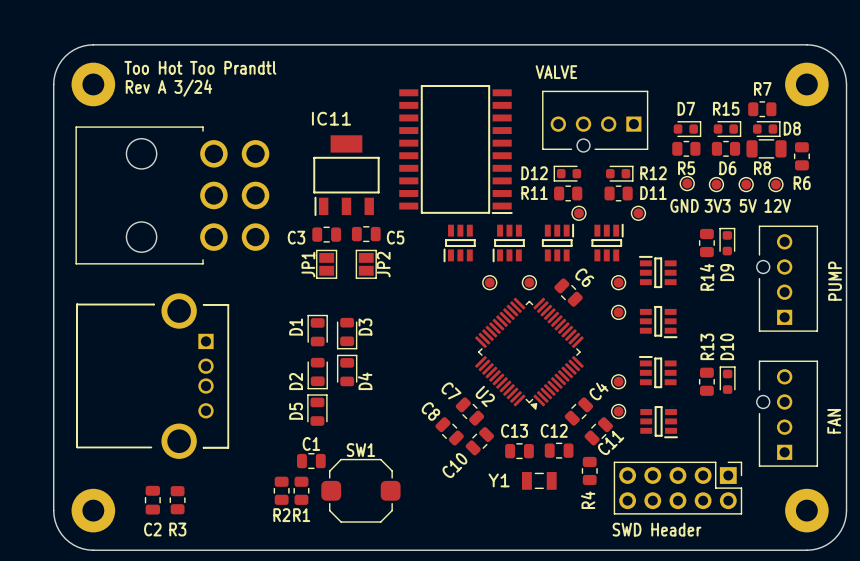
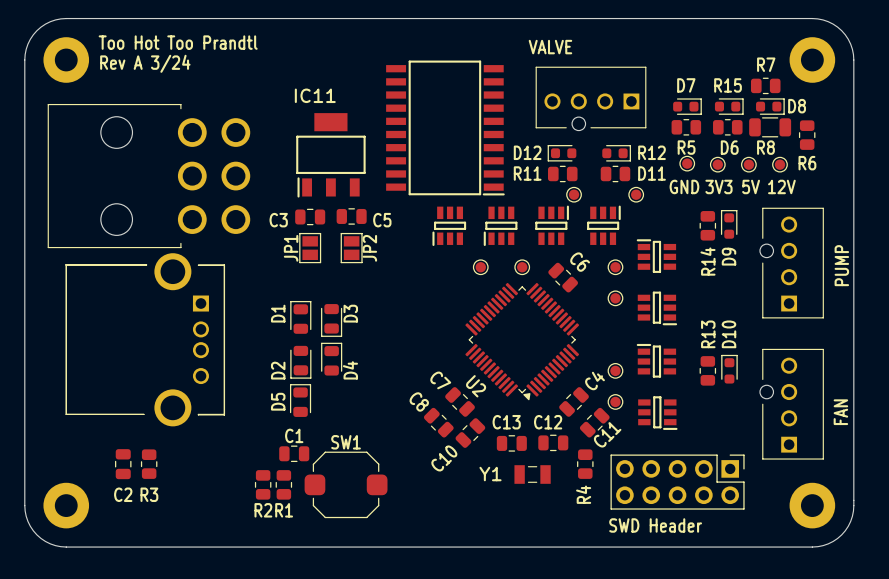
part position: (152, 376) -> (145, 339)
C2 position: (152, 500) -> (123, 464)
R3 position: (177, 500) -> (149, 464)

